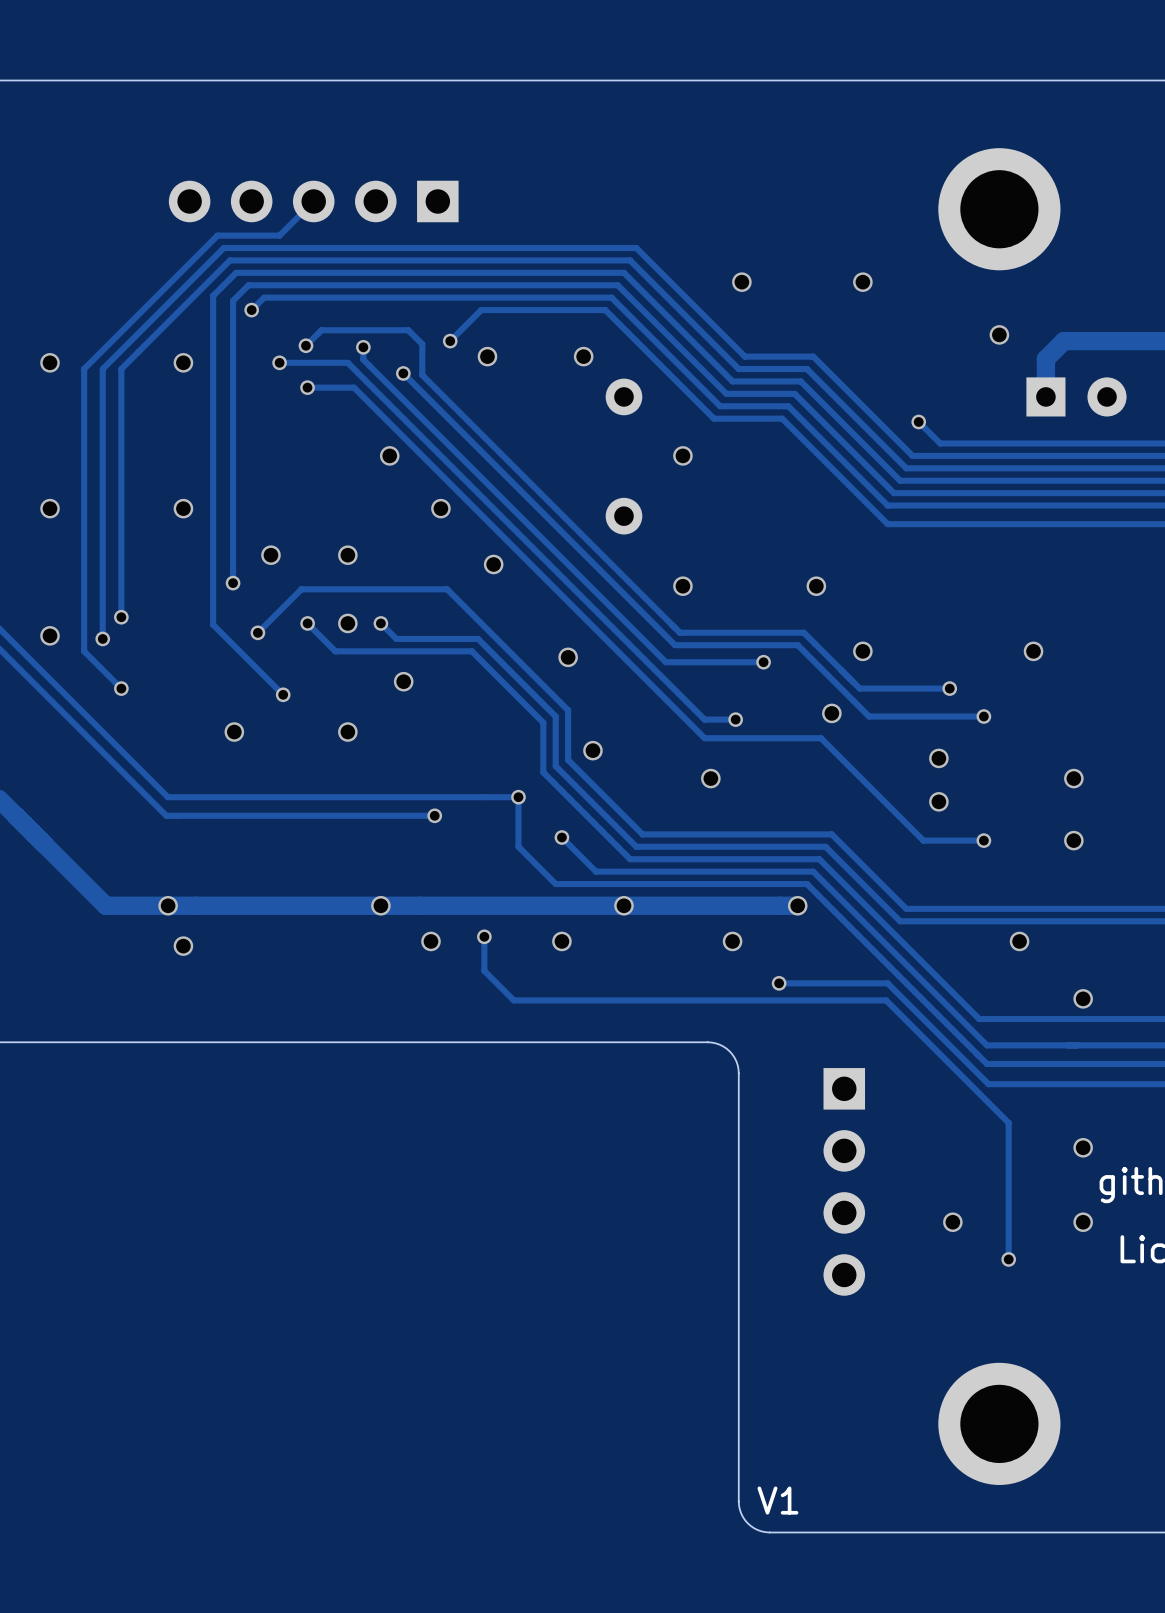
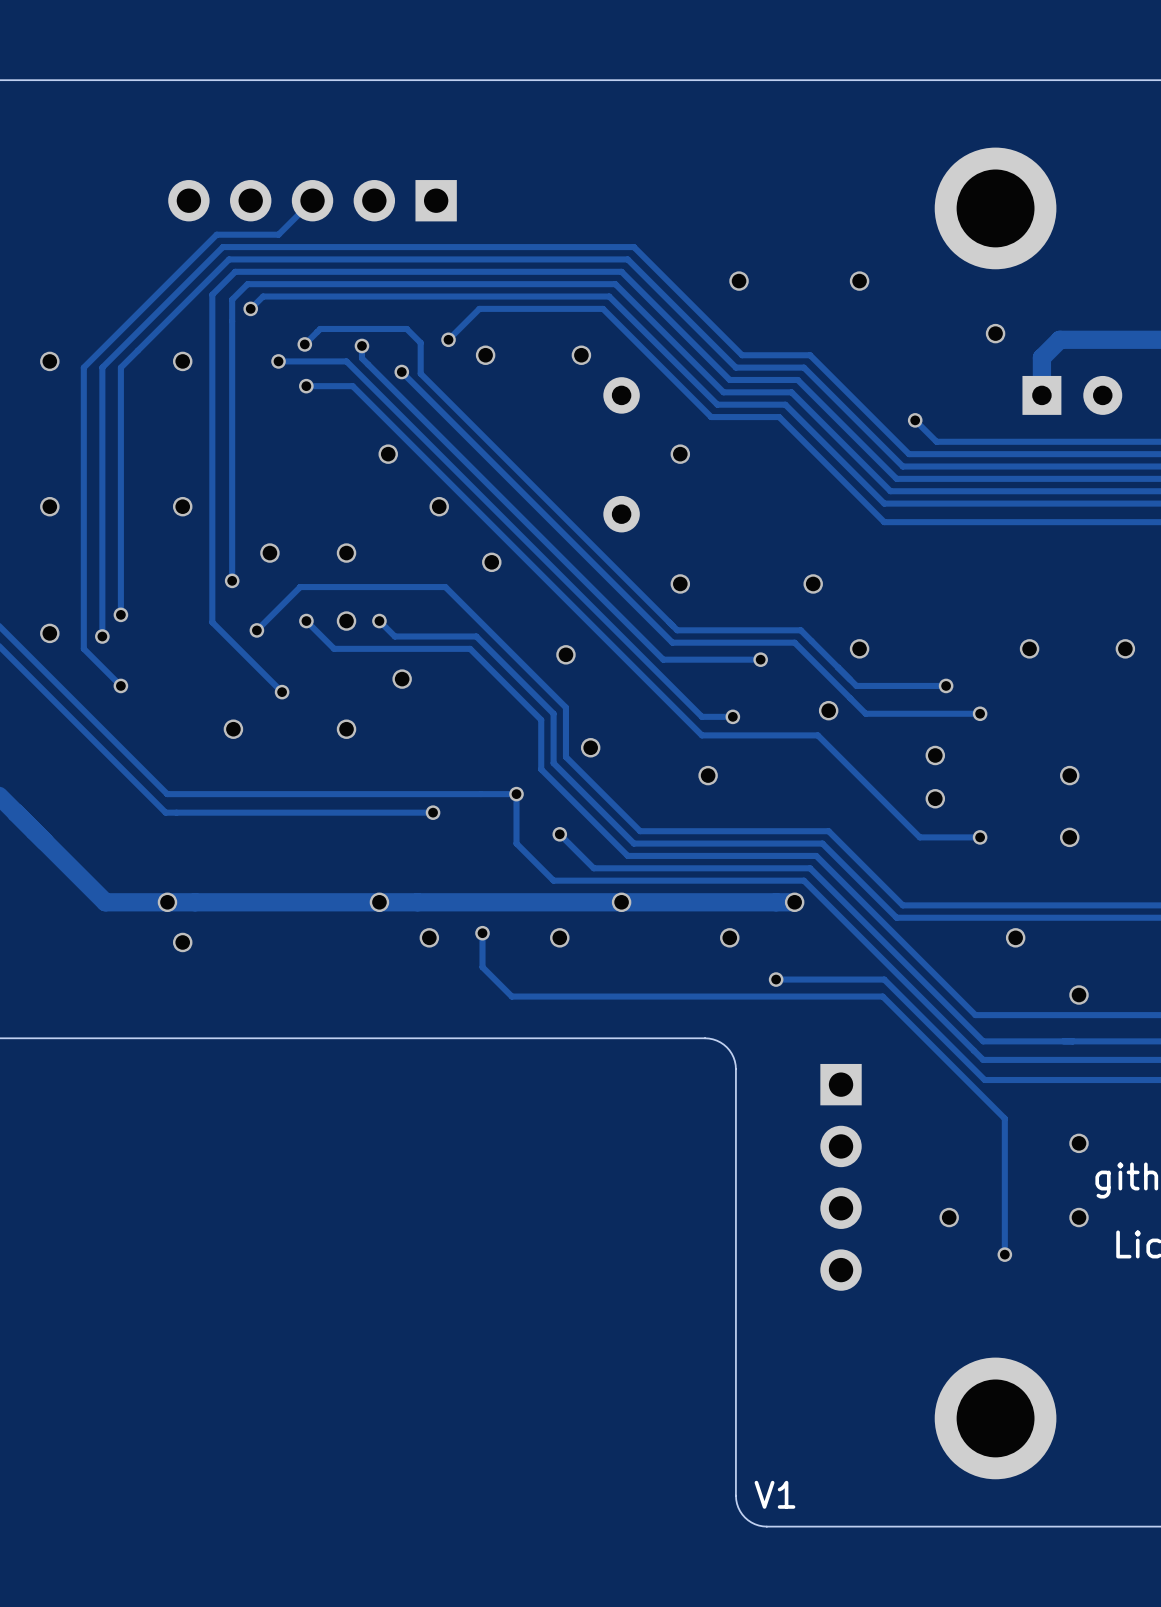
via: none -> (1125, 648)

